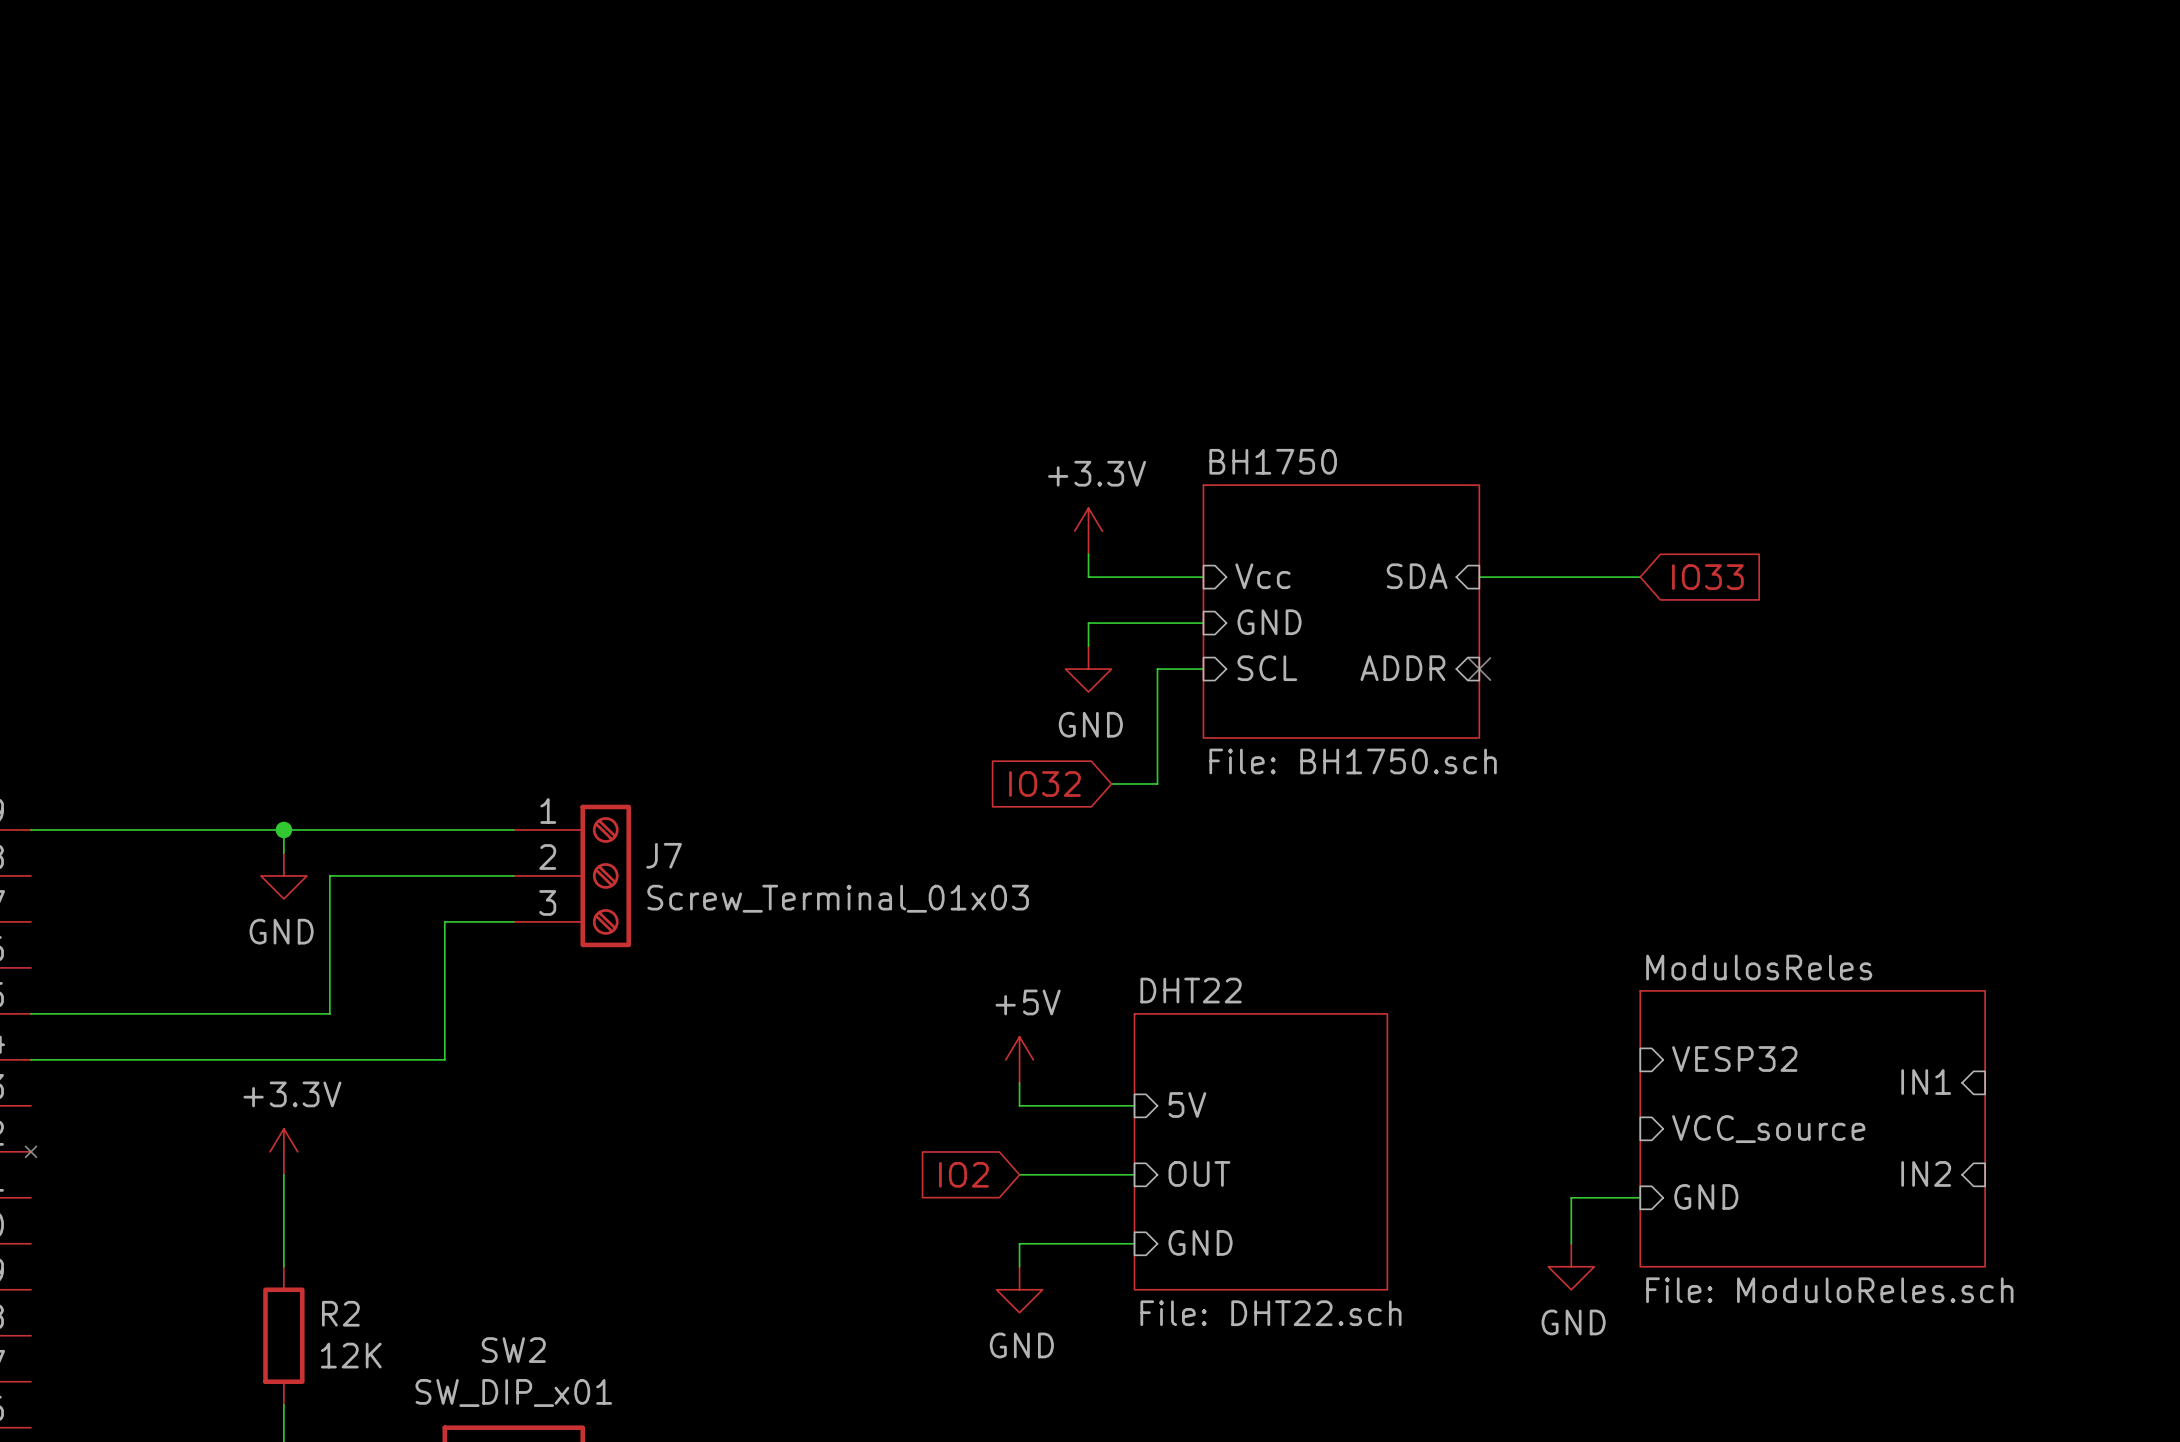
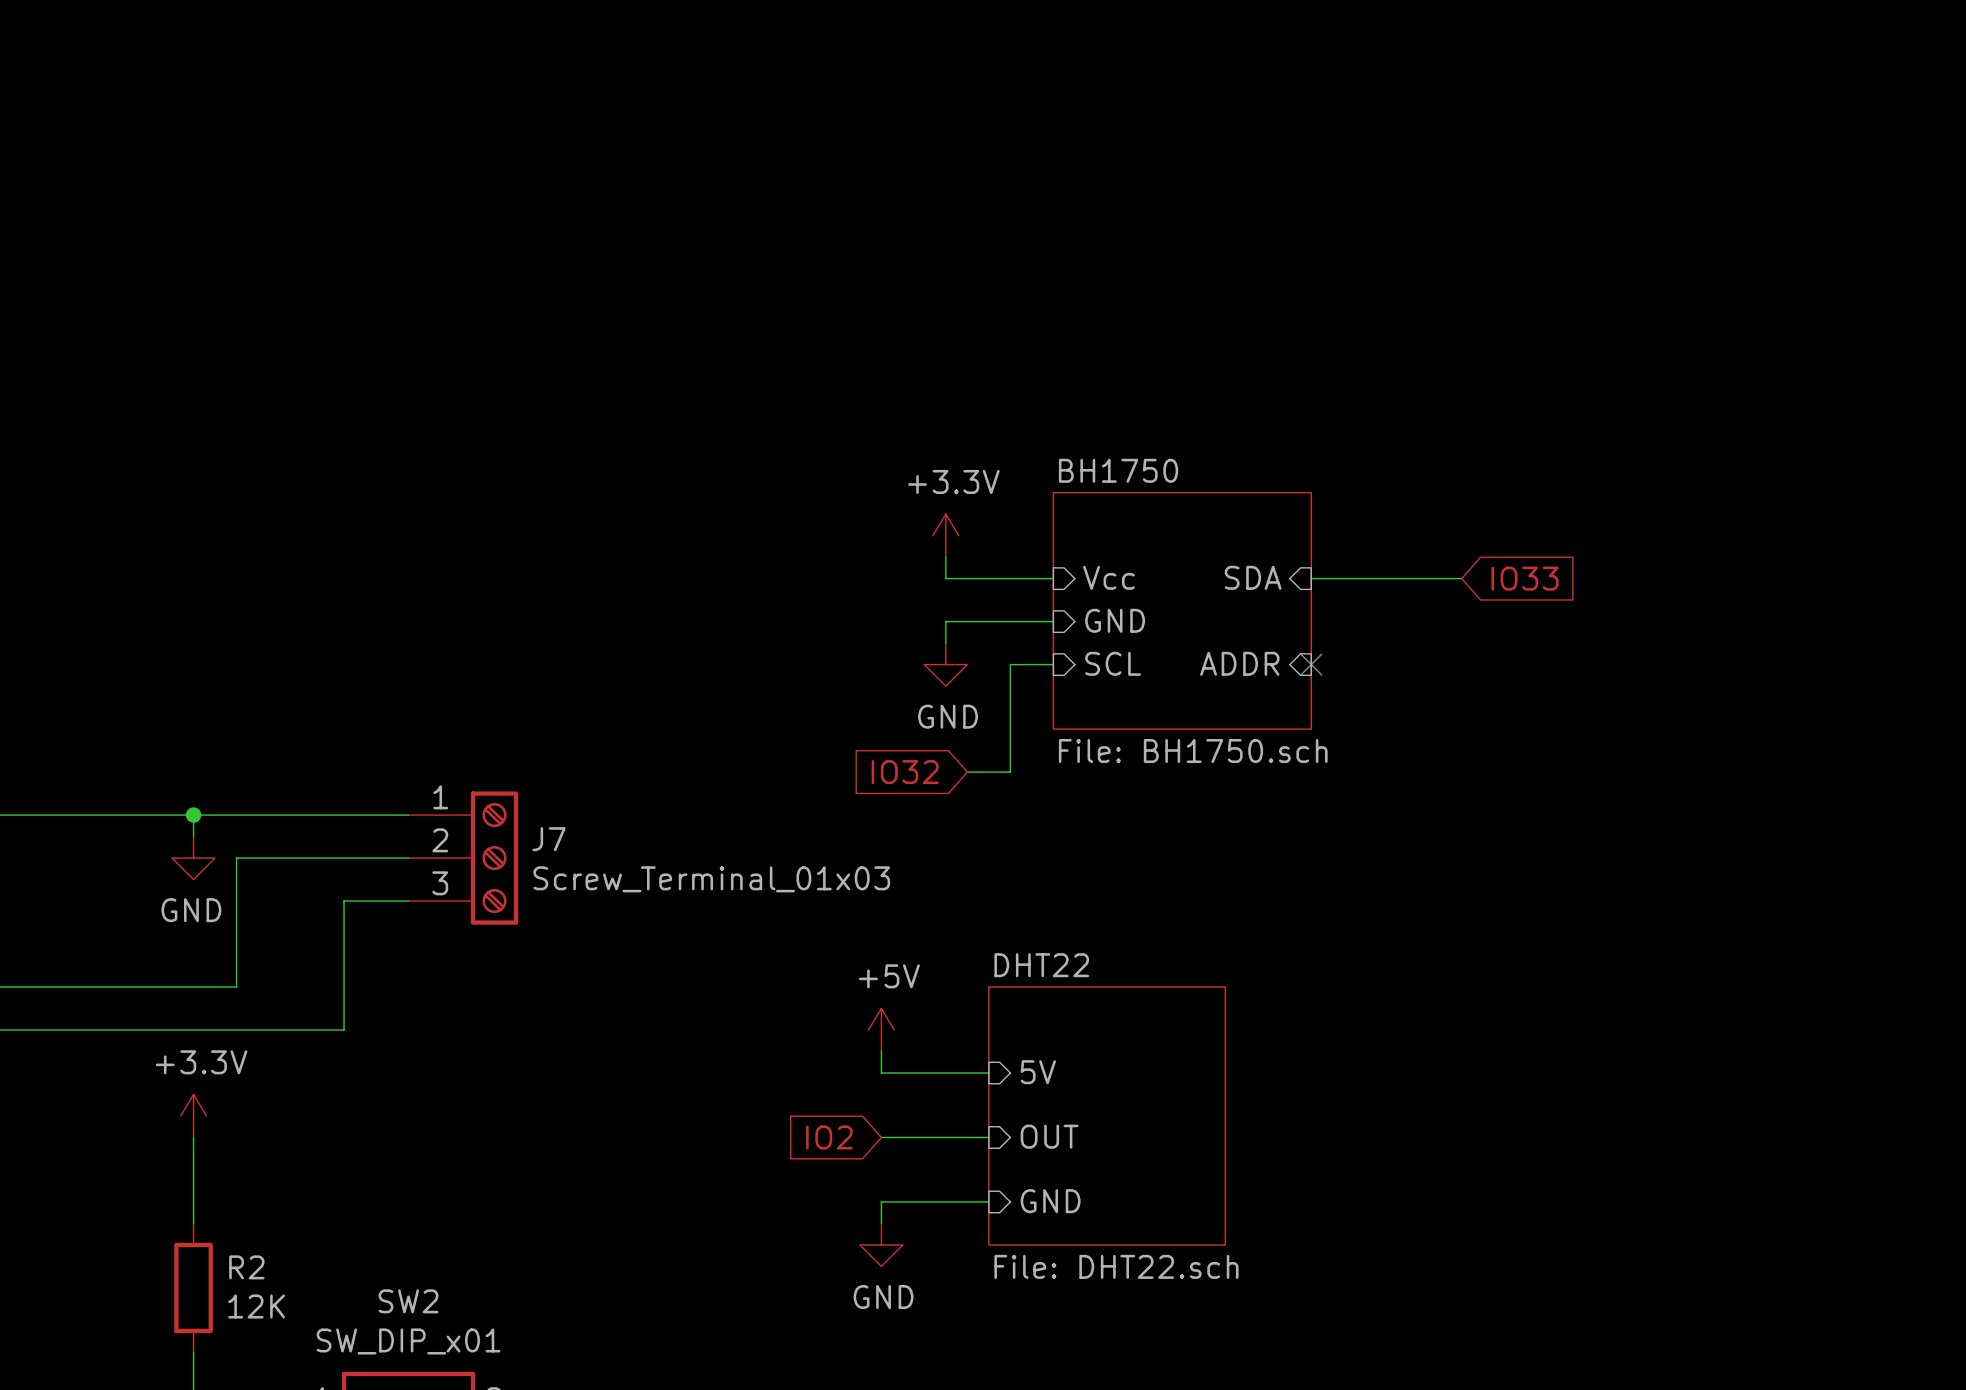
sheet pin: VESP32 (1734, 1059) -> none
sheet pin: IN1 (1926, 1082) -> none
sheet ModulosReles: File: ModuloReles.sch (1812, 1128) -> none
sheet pin: VCC_source (1768, 1129) -> none
sheet pin: IN2 (1926, 1173) -> none
sheet pin: GND (1706, 1196) -> none
wire: (1640, 1197) (1571, 1197) (1571, 1243) -> none
power symbol: GND (1571, 1266) -> none

